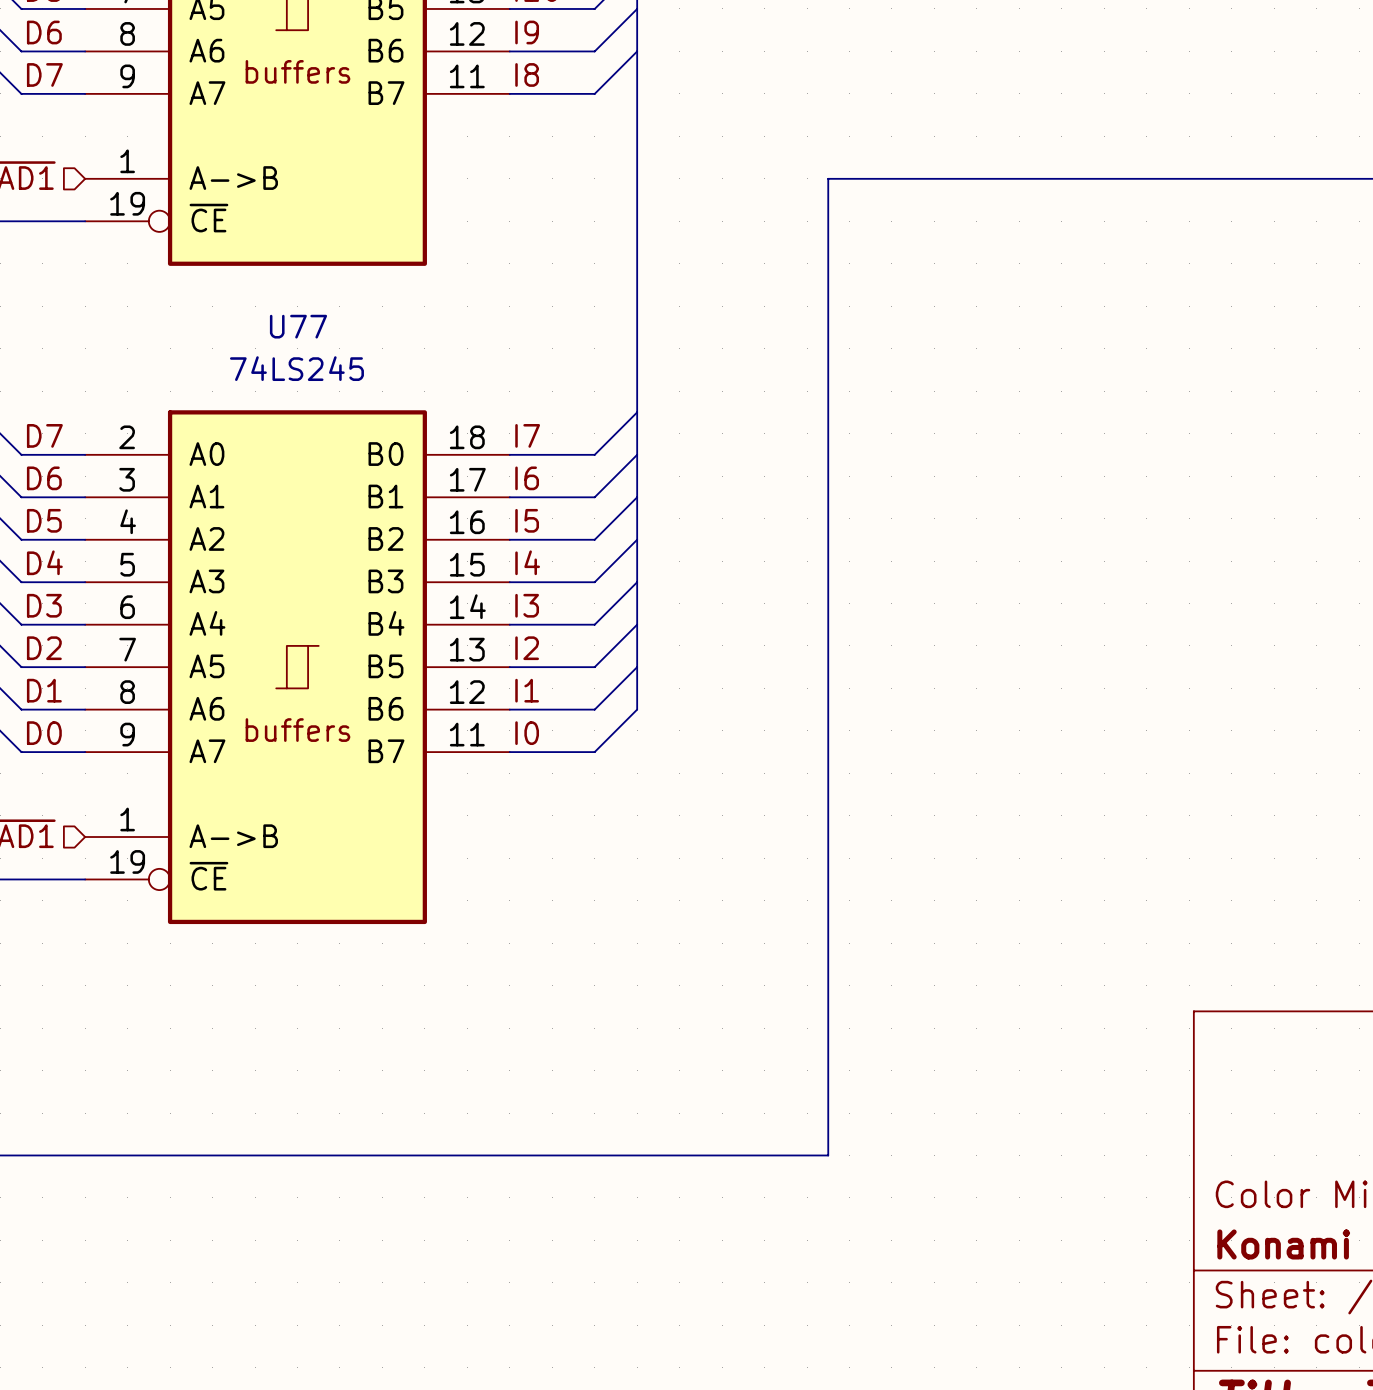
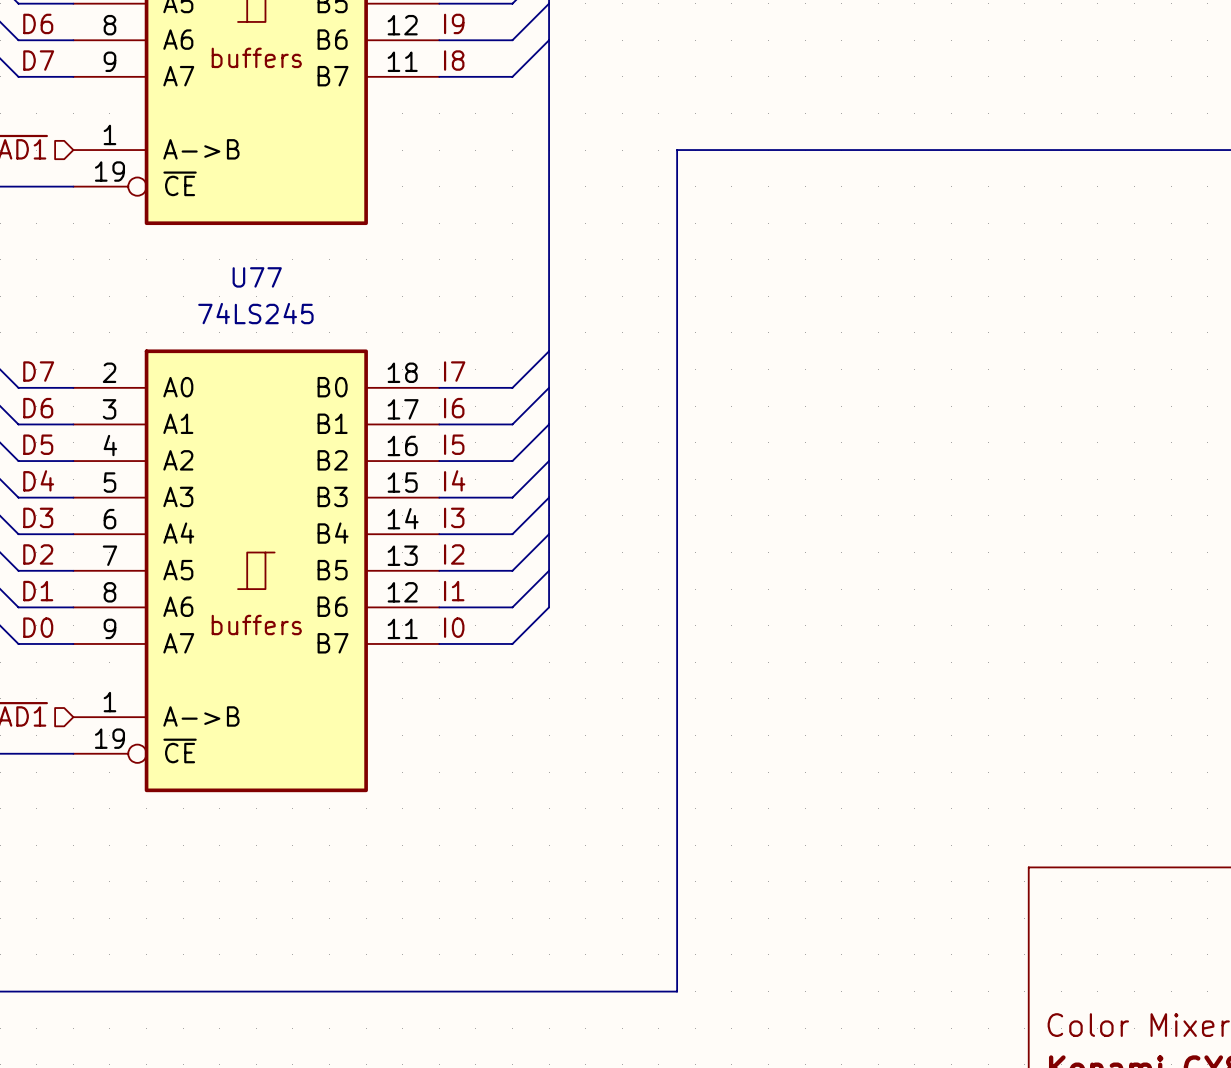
wire: (828, 178) (828, 1155) (785, 1155) -> (713, 150) (677, 150) (677, 991)

